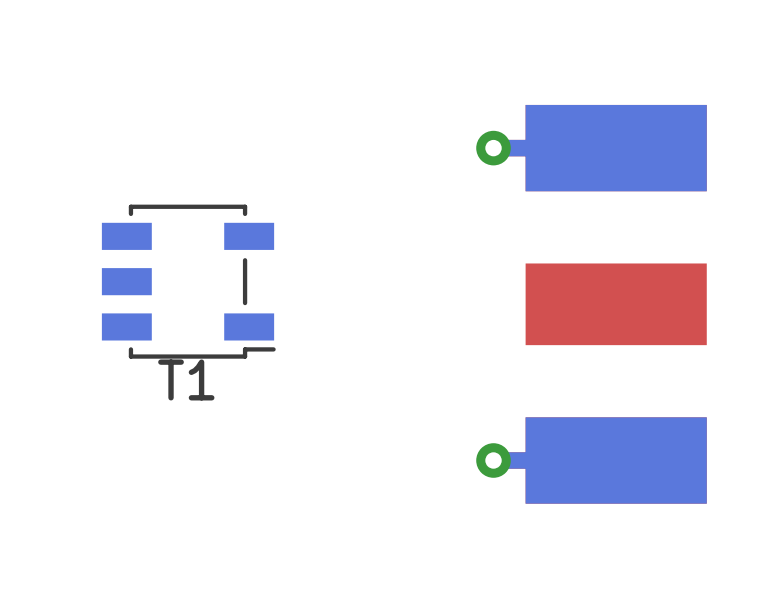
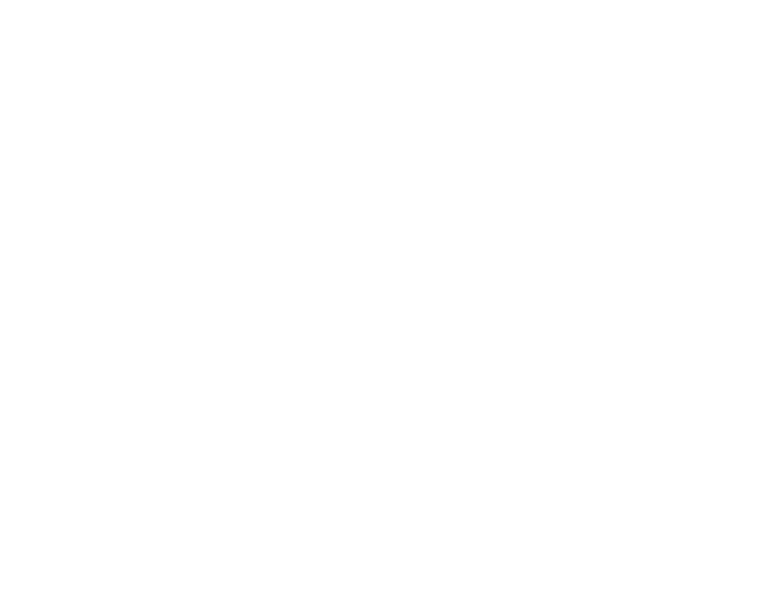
T1: (188, 281) -> none
part: (591, 304) -> none

